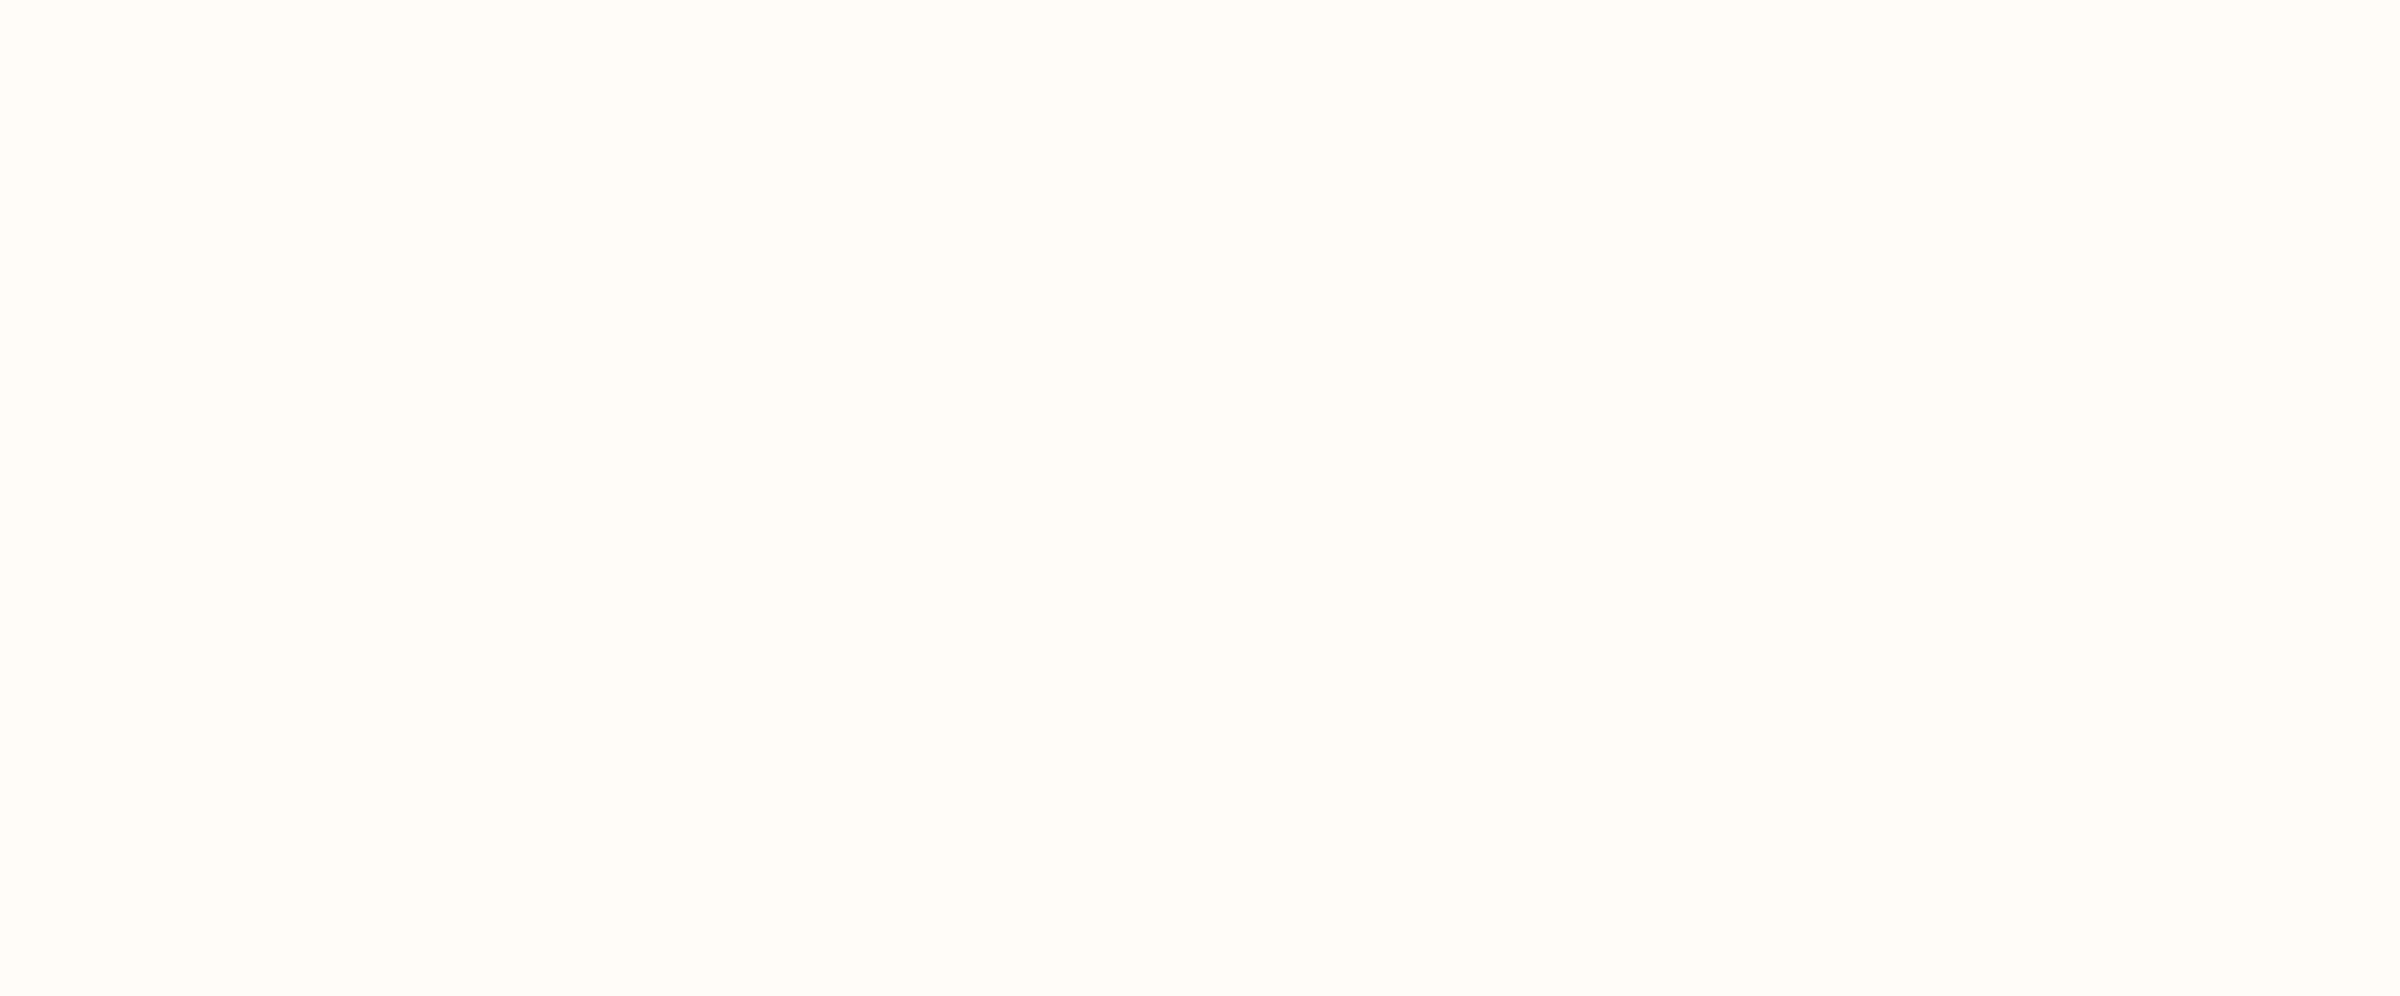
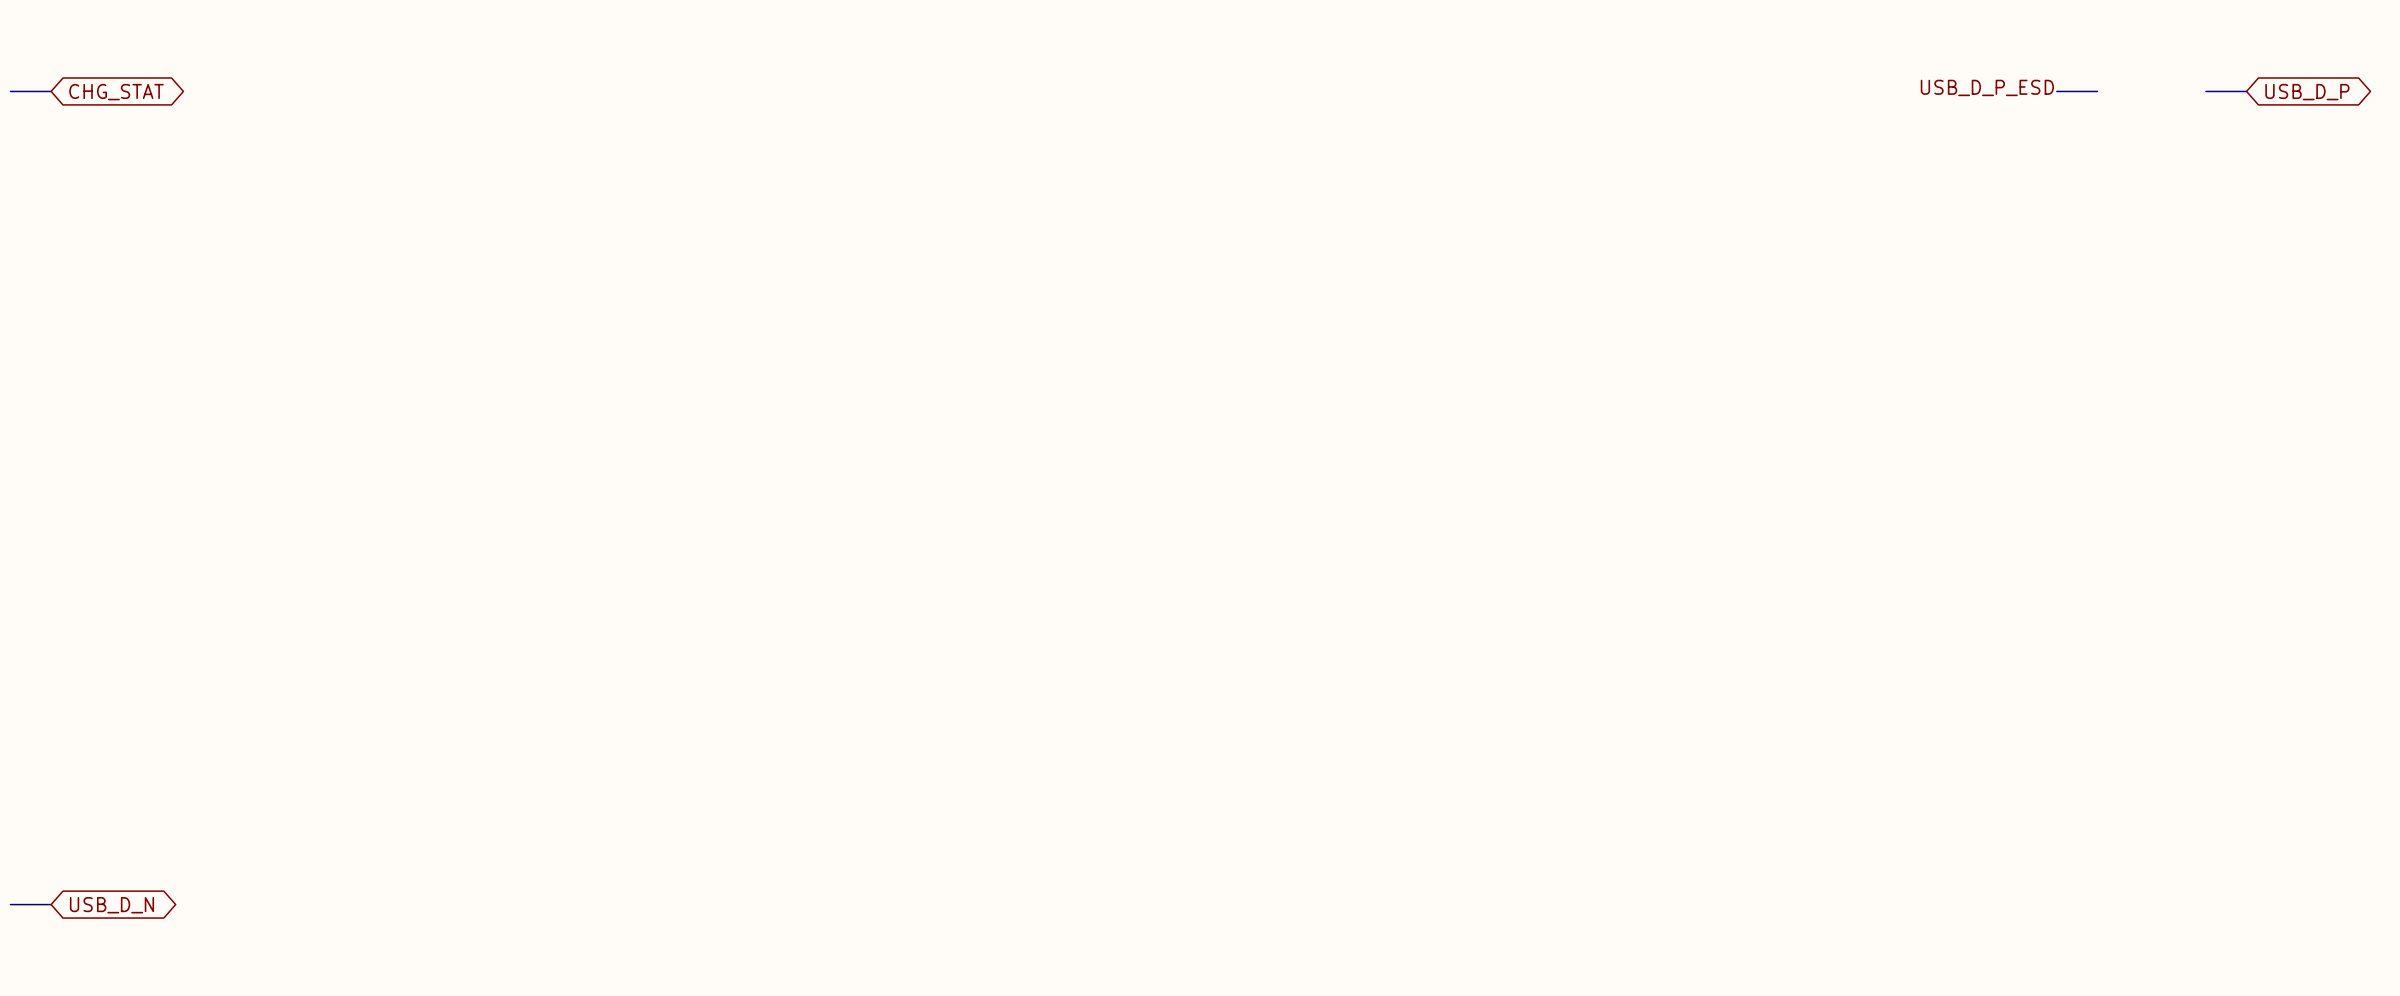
label: none -> USB_D_P_ESD (1987, 87)
wire: none -> (10, 91) (51, 91)
wire: none -> (2056, 91) (2097, 91)
wire: none -> (2205, 91) (2246, 91)
global label: none -> CHG_STAT (116, 92)
global label: none -> USB_D_P (2307, 92)
wire: none -> (10, 904) (51, 904)
global label: none -> USB_D_N (111, 905)

